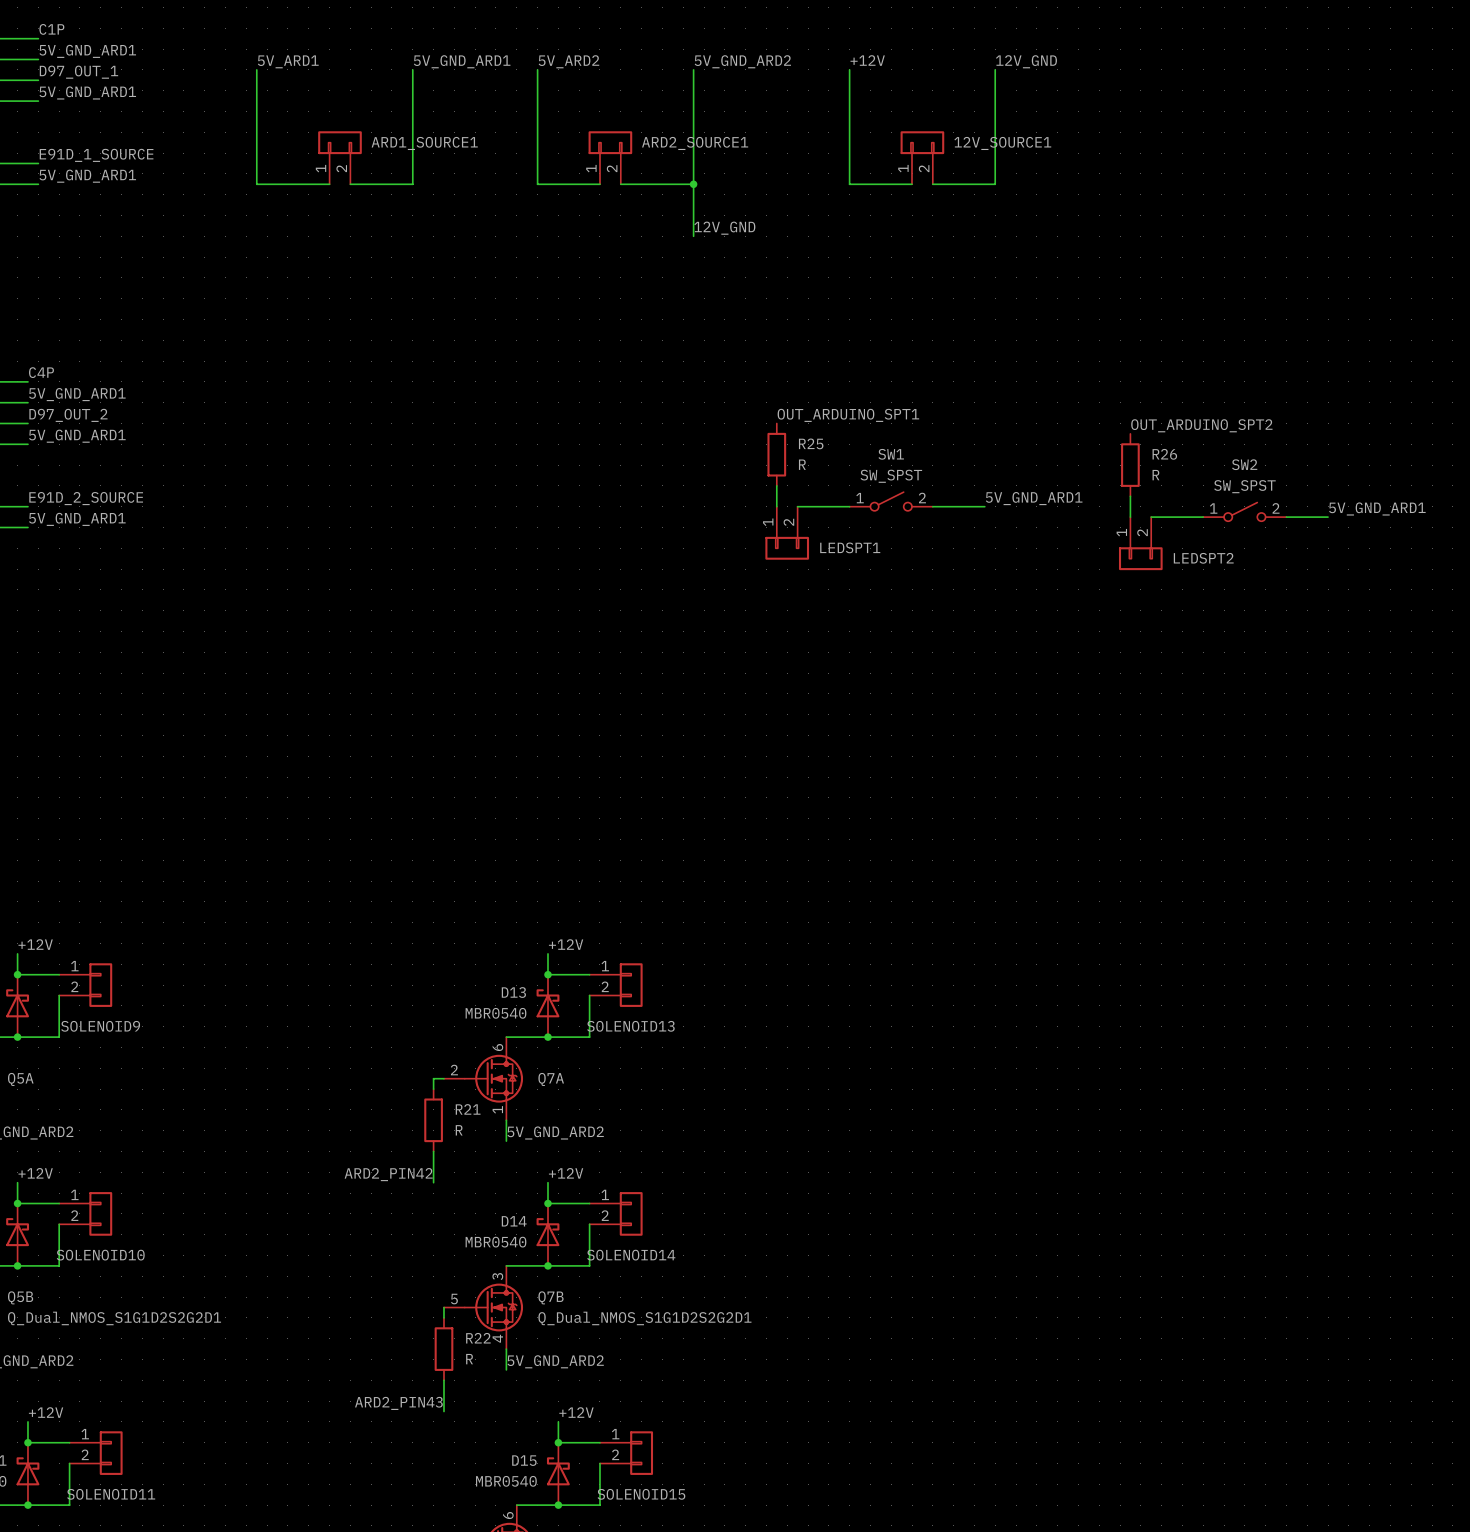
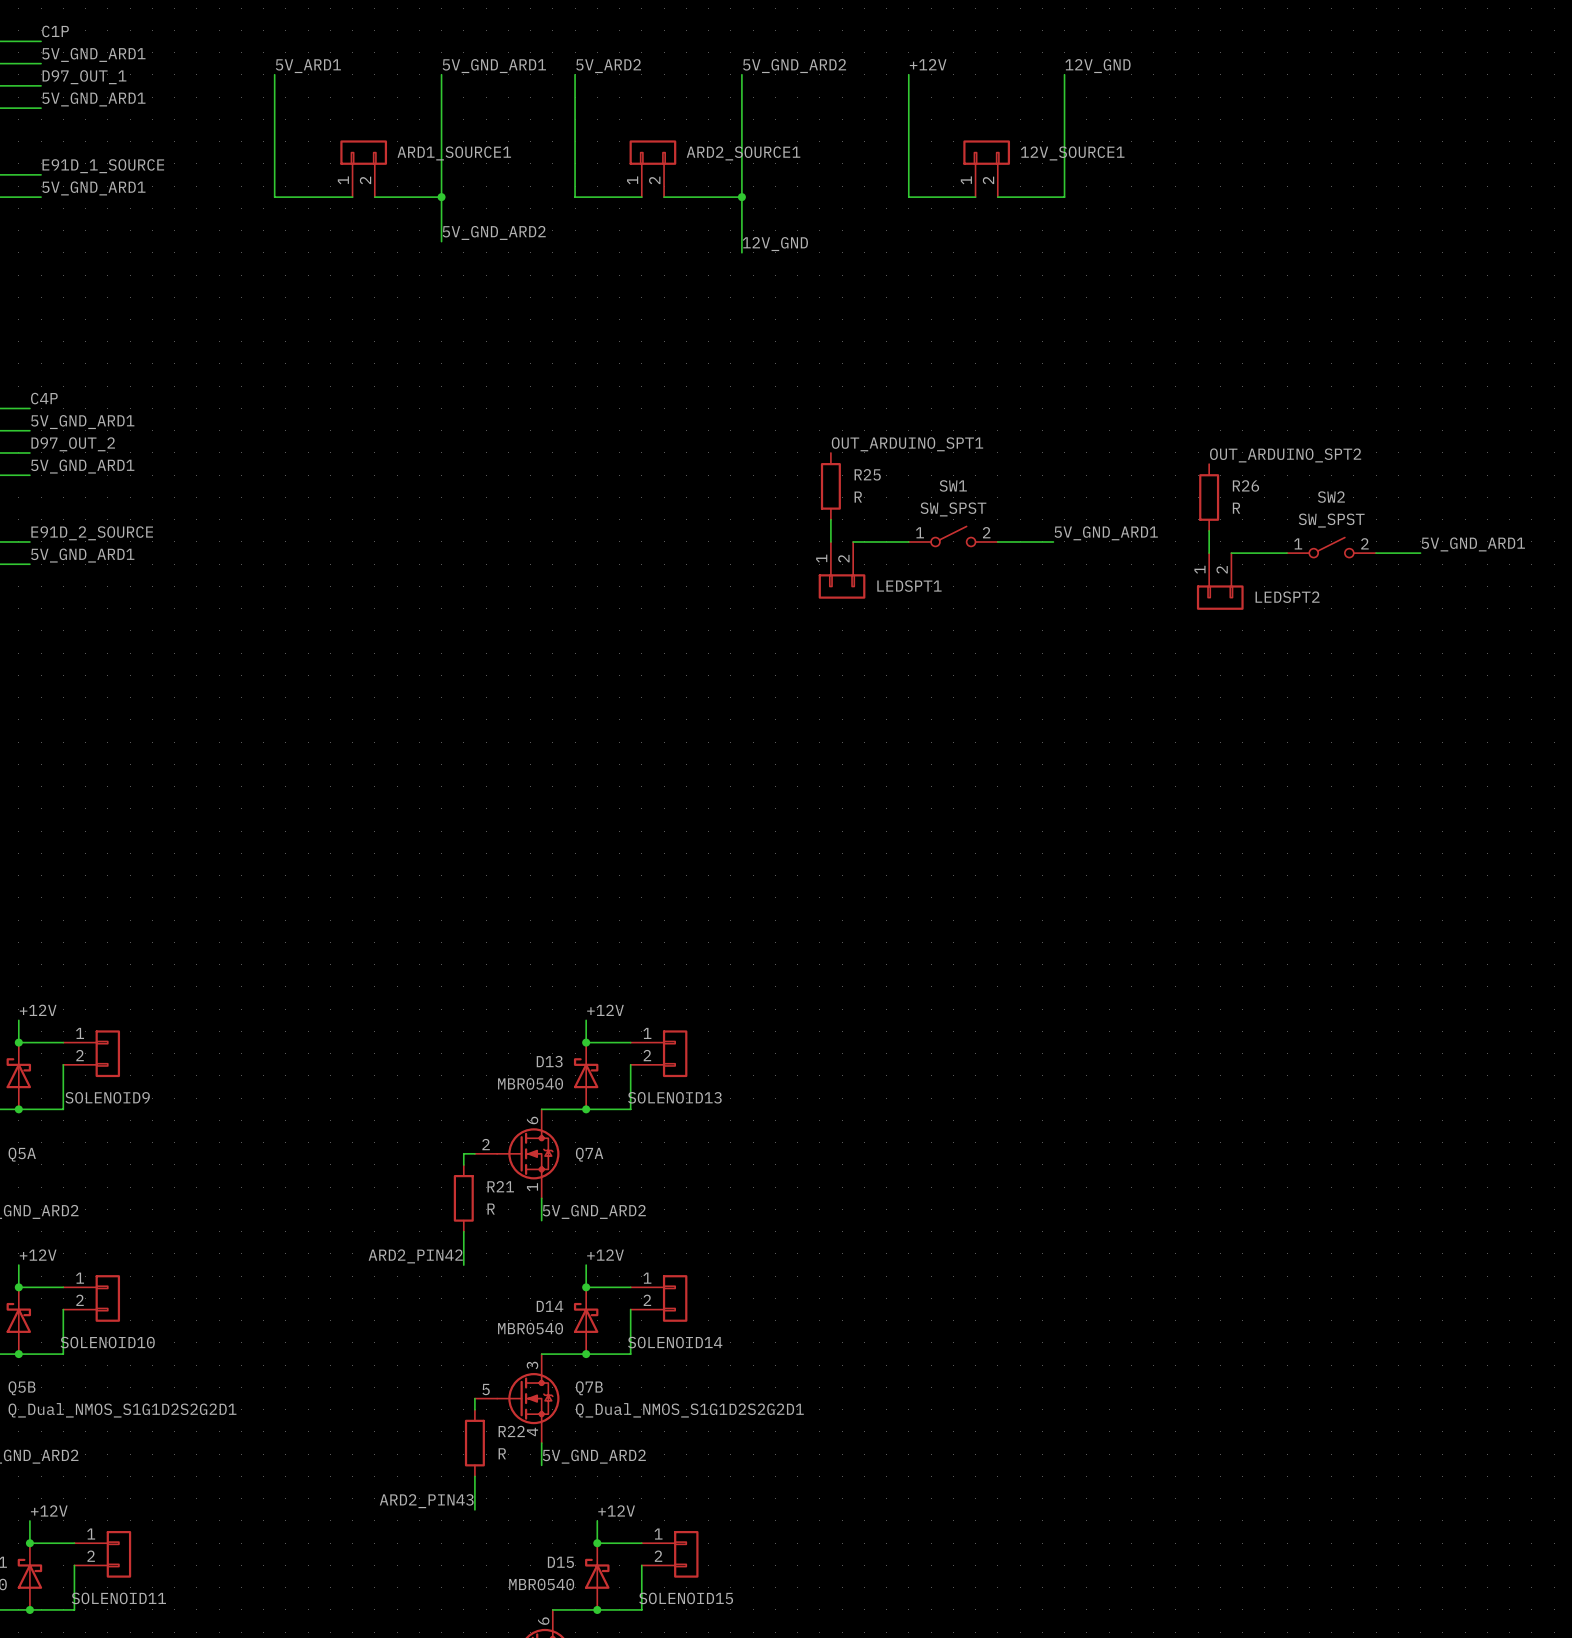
wire: none -> (441, 197) (441, 241)
junction: none -> (441, 197)
label: none -> 5V_GND_ARD2 (494, 232)

